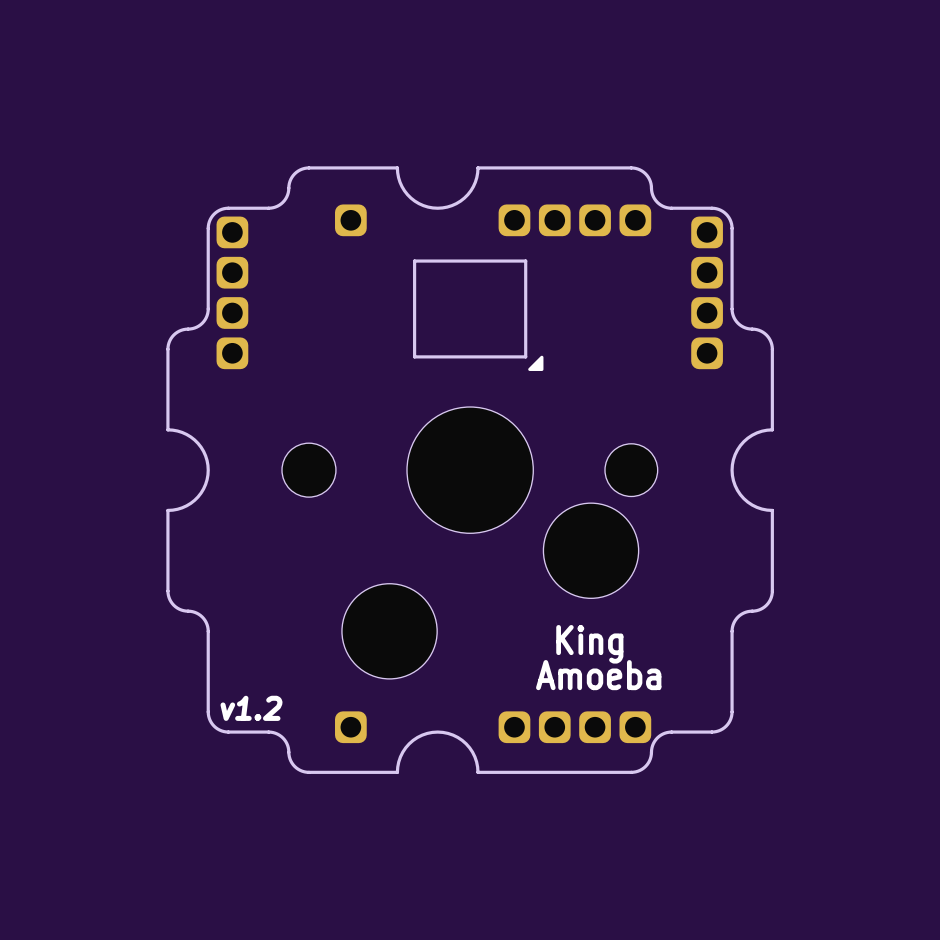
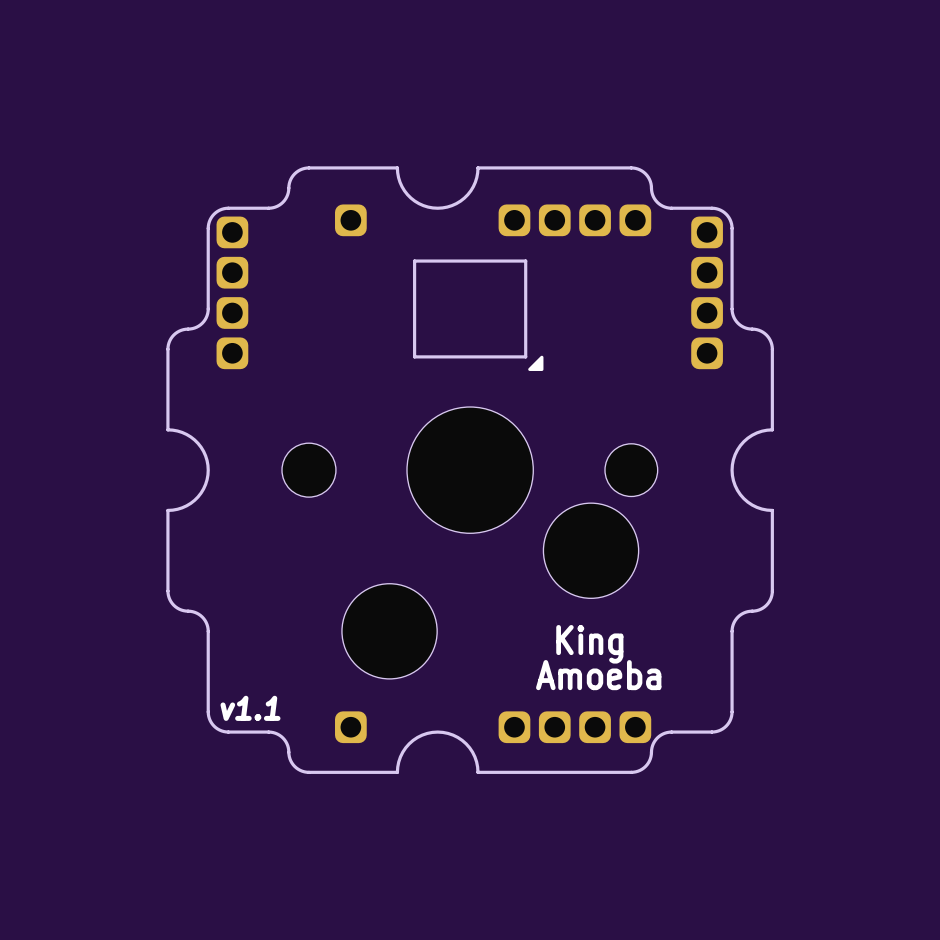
text: v1.2 (251, 708) -> v1.1 (250, 708)

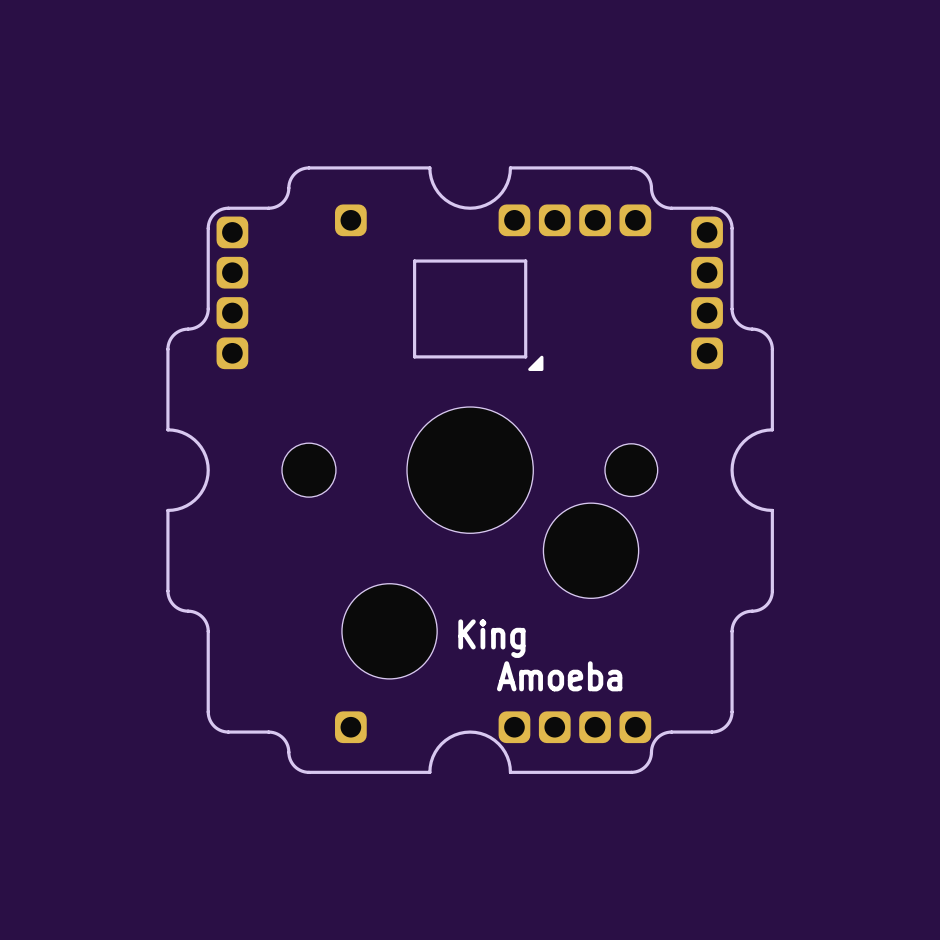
board edge: (397, 167) (400, 182) (407, 194) (423, 205) (437, 208) (451, 205) (467, 194) (475, 182) (477, 167) (510, 167) -> (397, 167) (429, 167) (432, 183) (441, 196) (454, 205) (470, 208) (485, 205) (498, 196) (507, 183) (510, 167)
text position: King (589, 644) -> King (491, 638)
text position: Amoeba (598, 675) -> Amoeba (559, 676)
text: v1.1 (250, 708) -> none
board edge: (397, 772) (400, 756) (409, 743) (422, 735) (437, 732) (453, 735) (466, 743) (474, 756) (477, 772) (510, 772) -> (397, 772) (429, 772) (432, 756) (441, 743) (454, 735) (470, 732) (485, 735) (498, 743) (507, 756) (510, 772)

